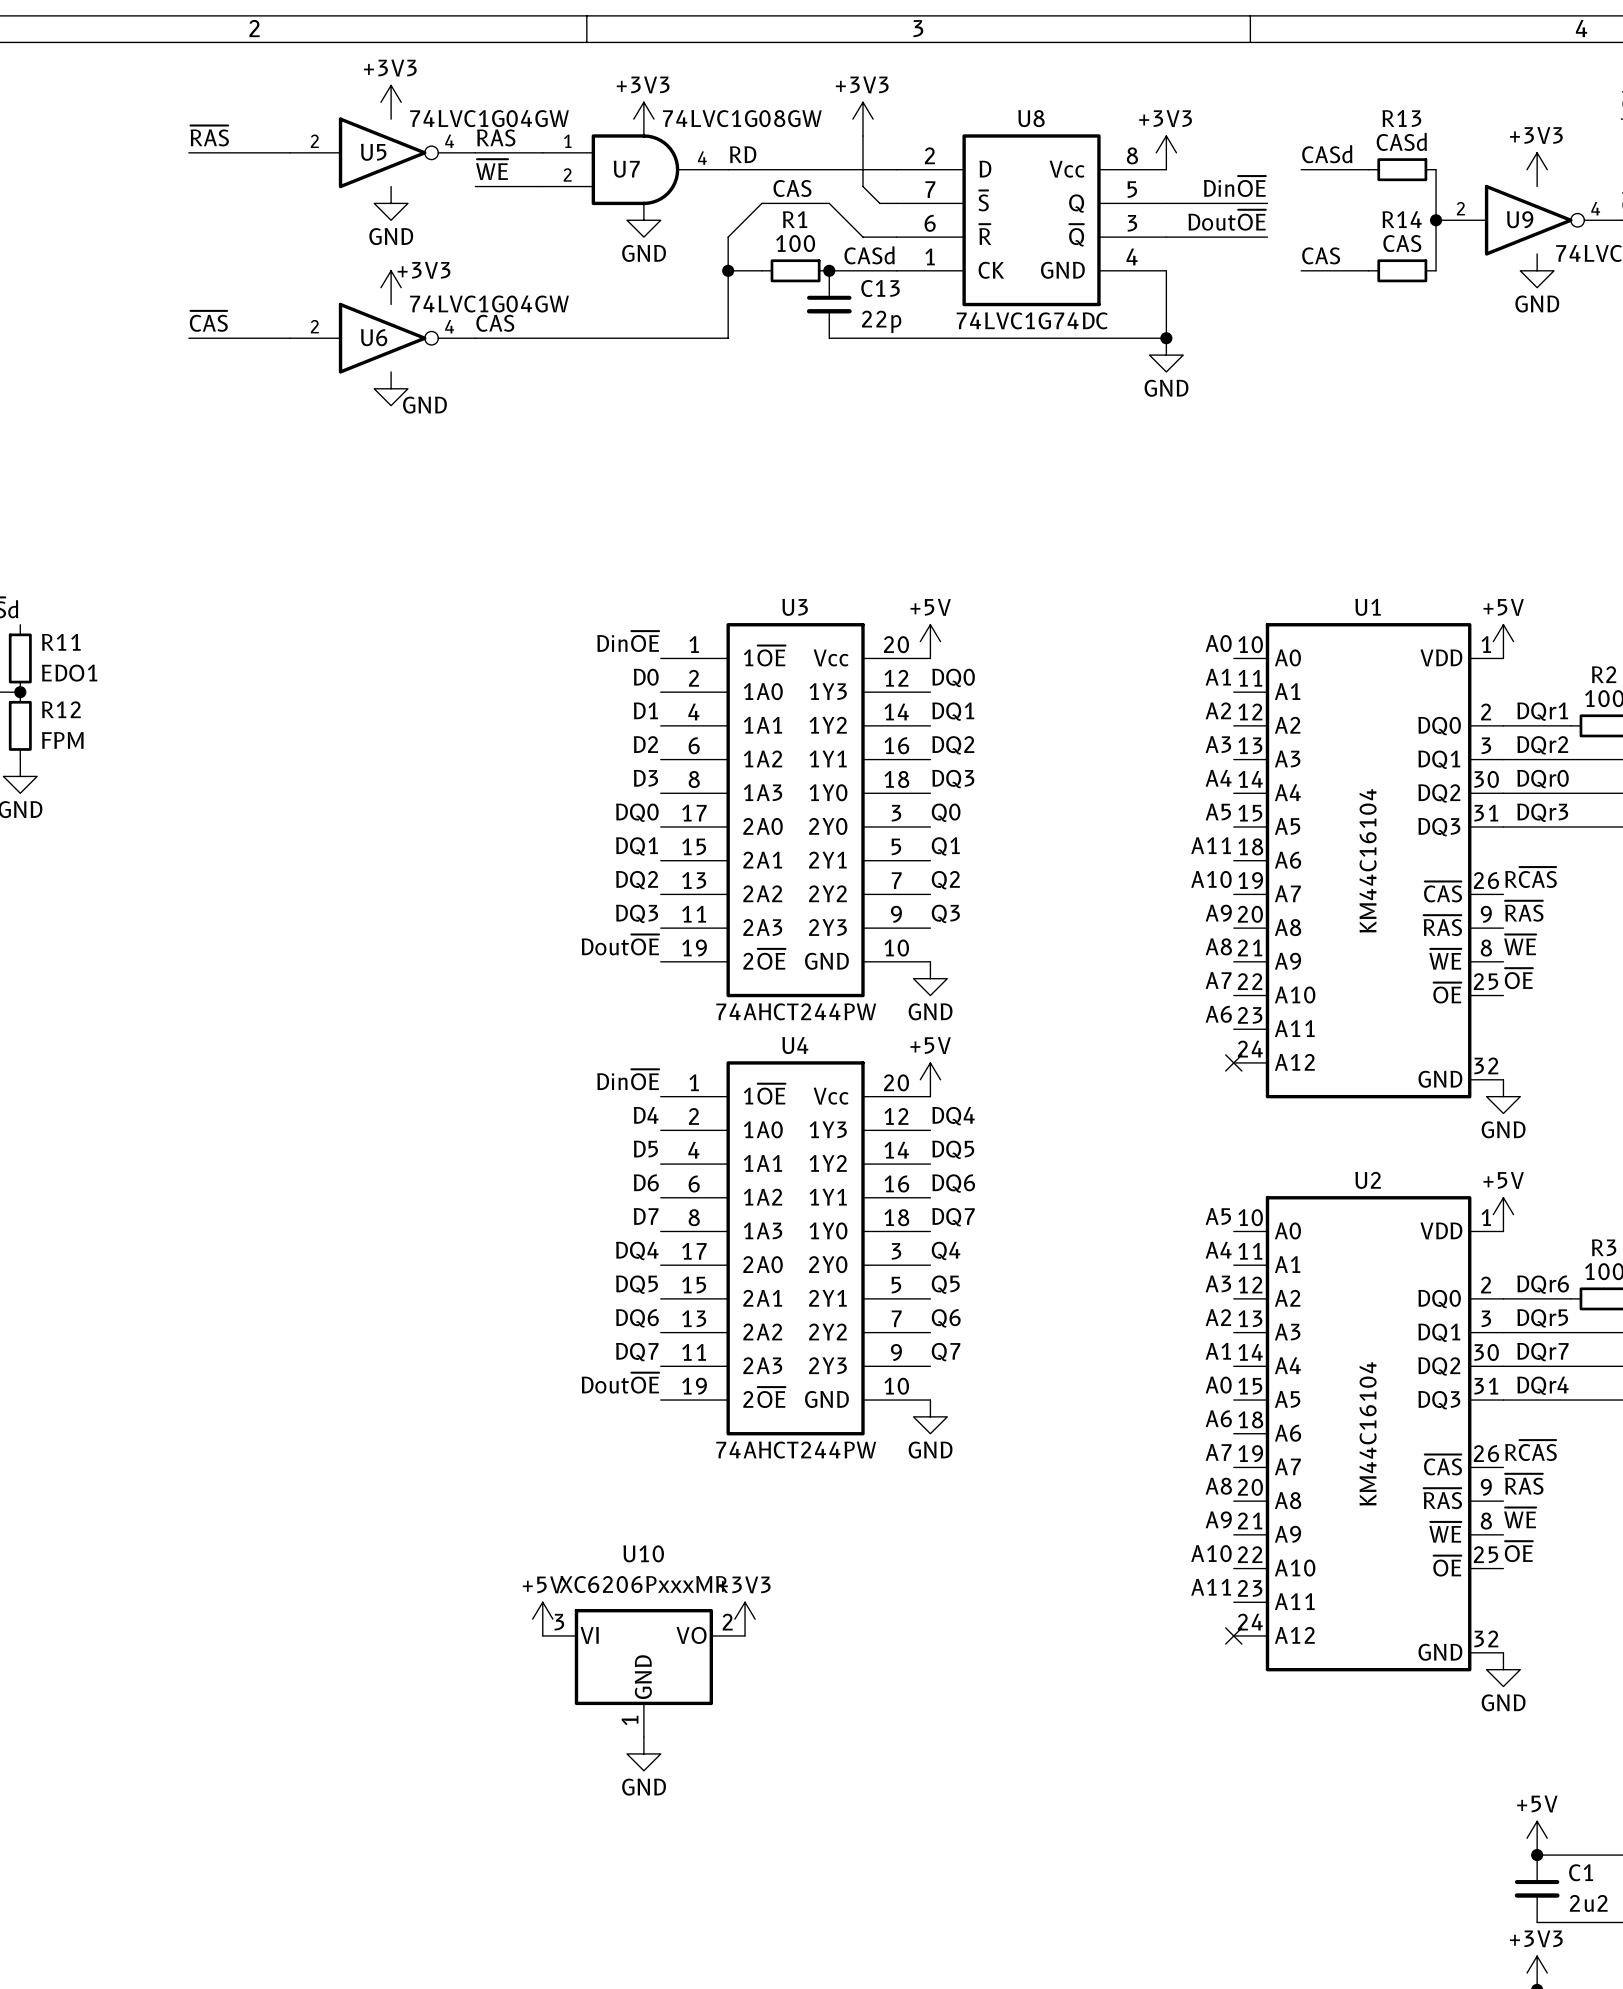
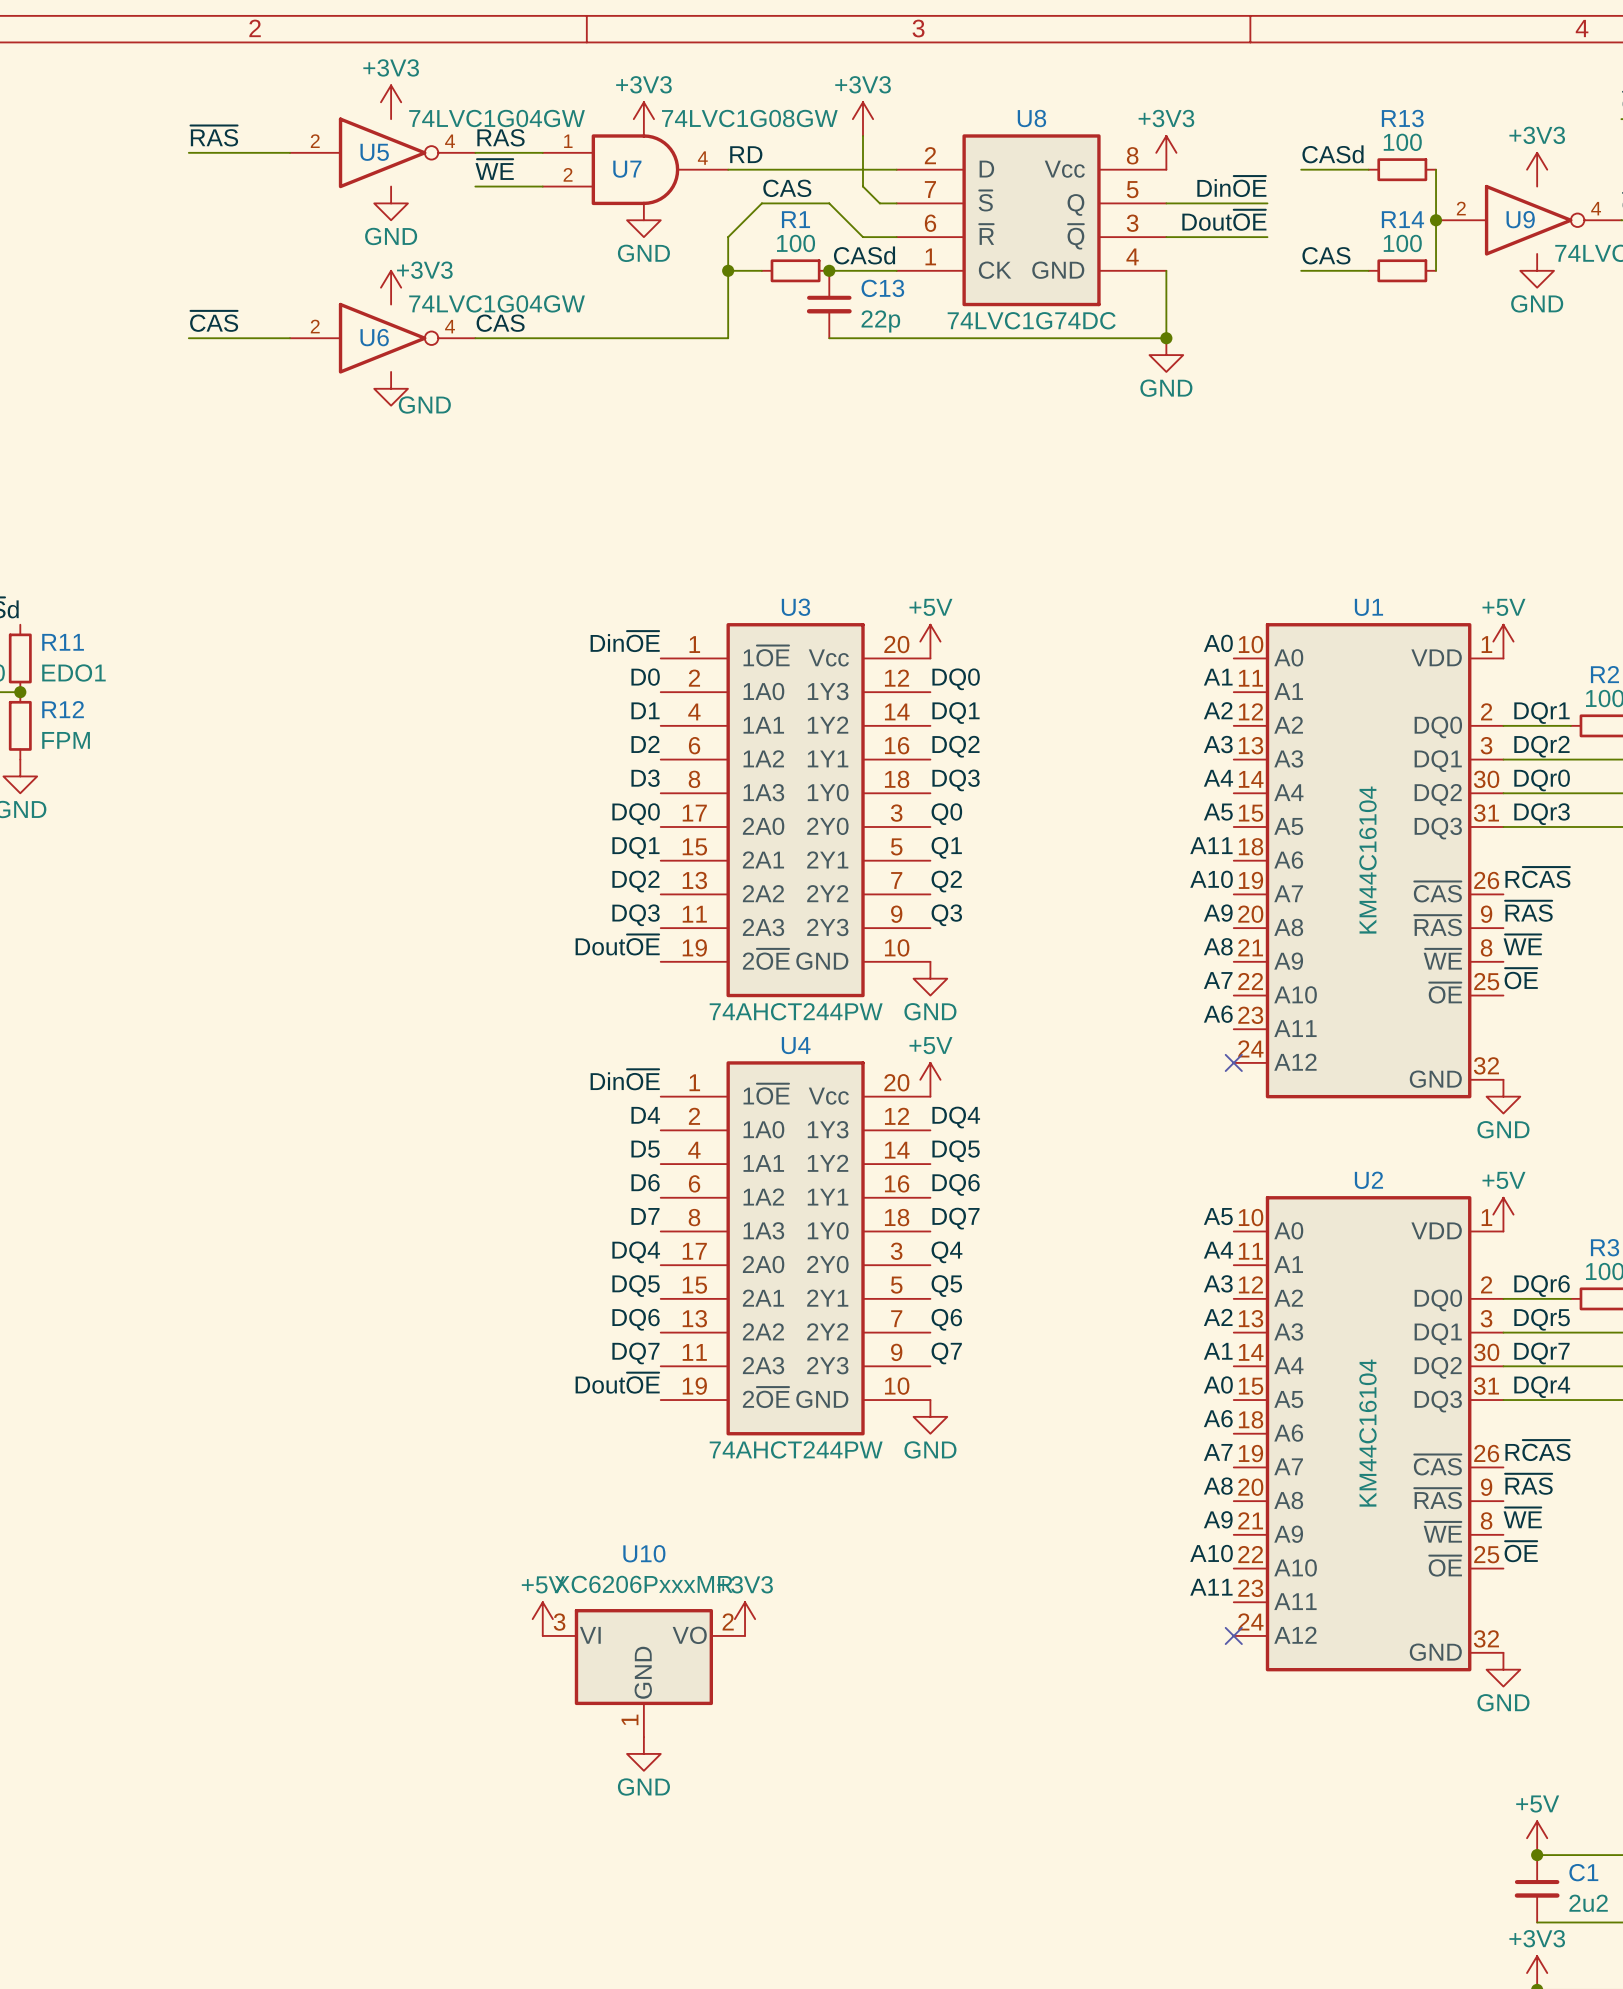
R13 value: CASd (1401, 141) -> 100 (1402, 142)
R14 value: CAS (1402, 243) -> 100 (1402, 243)

